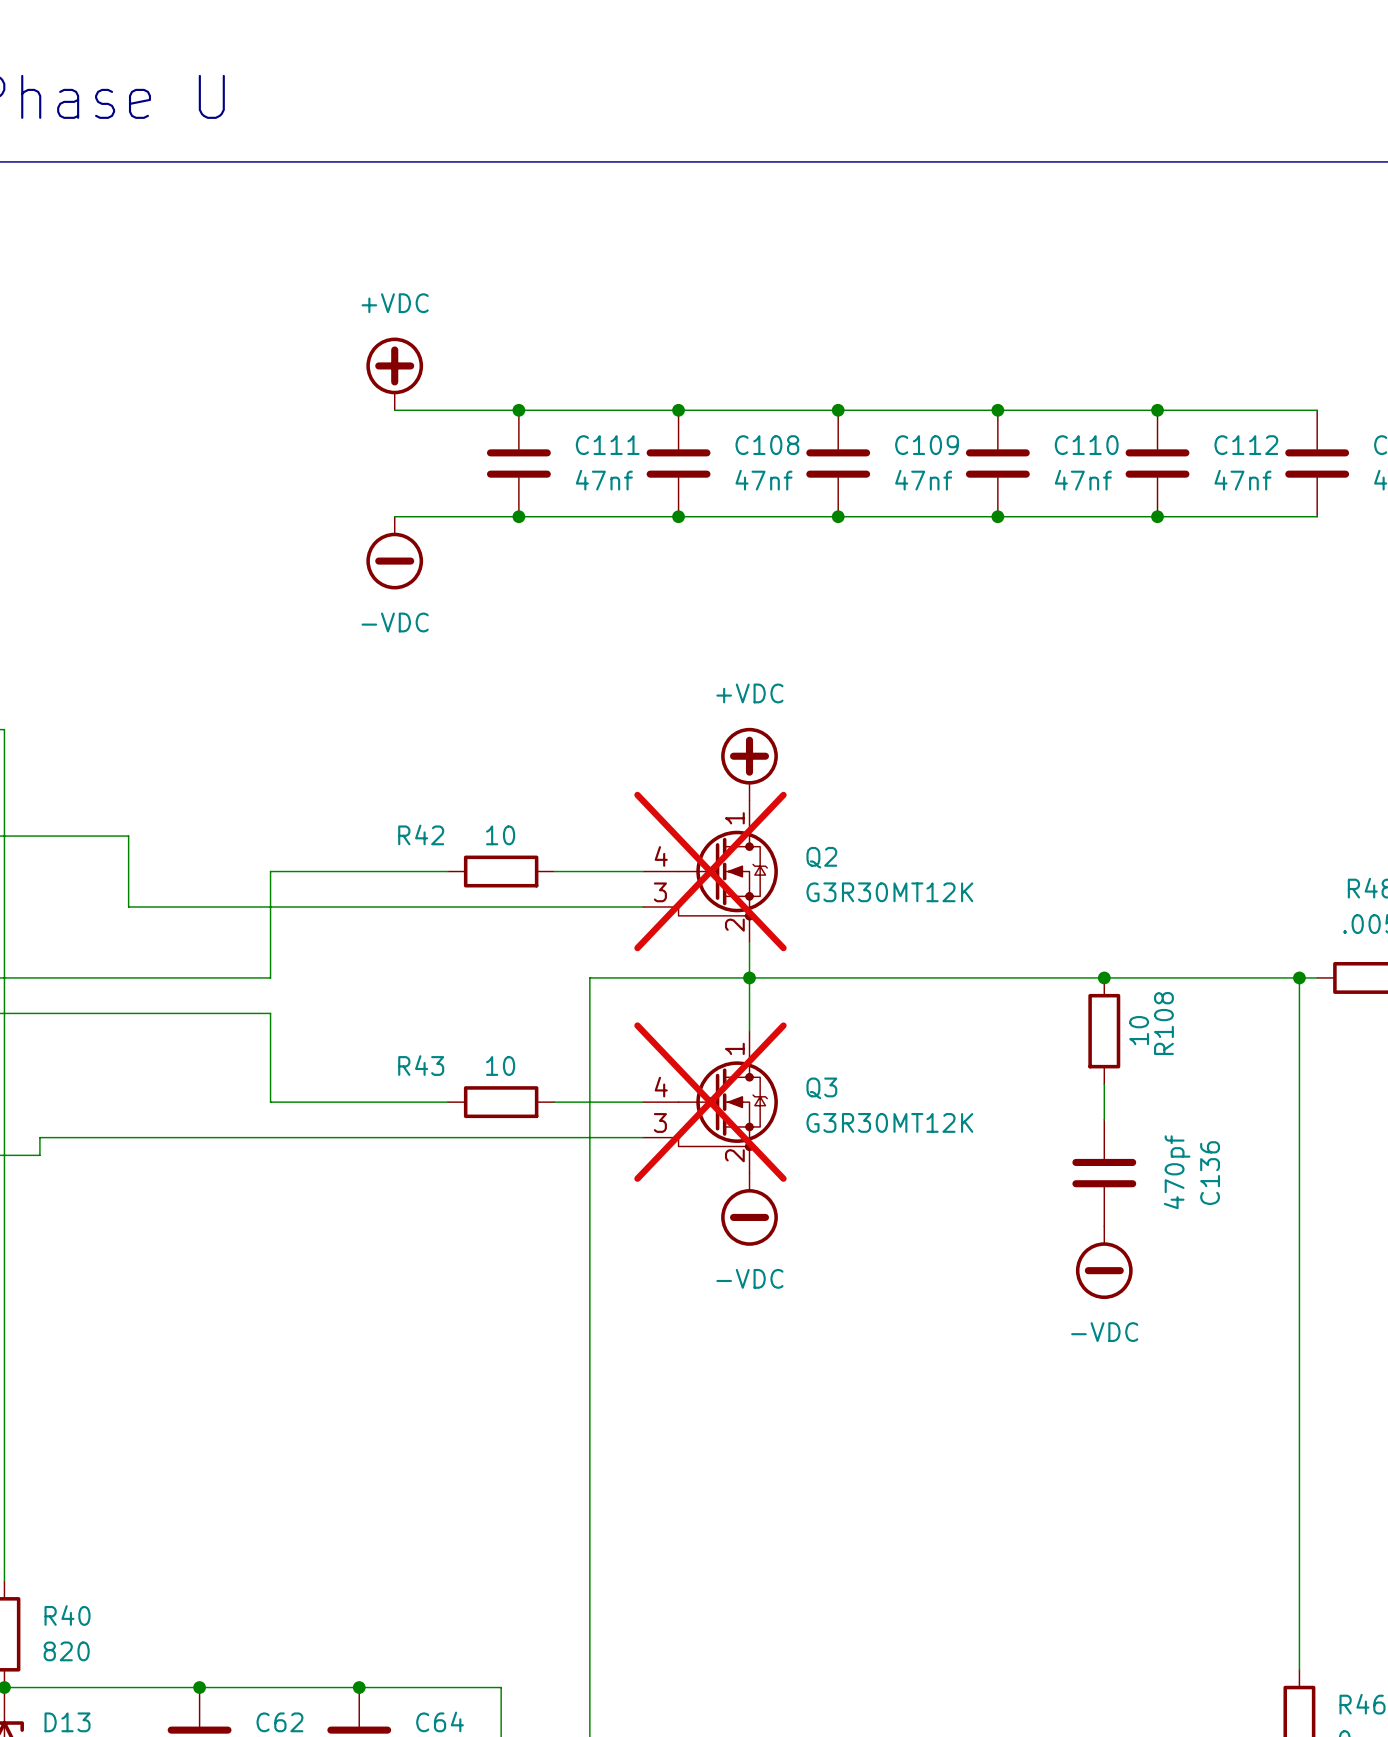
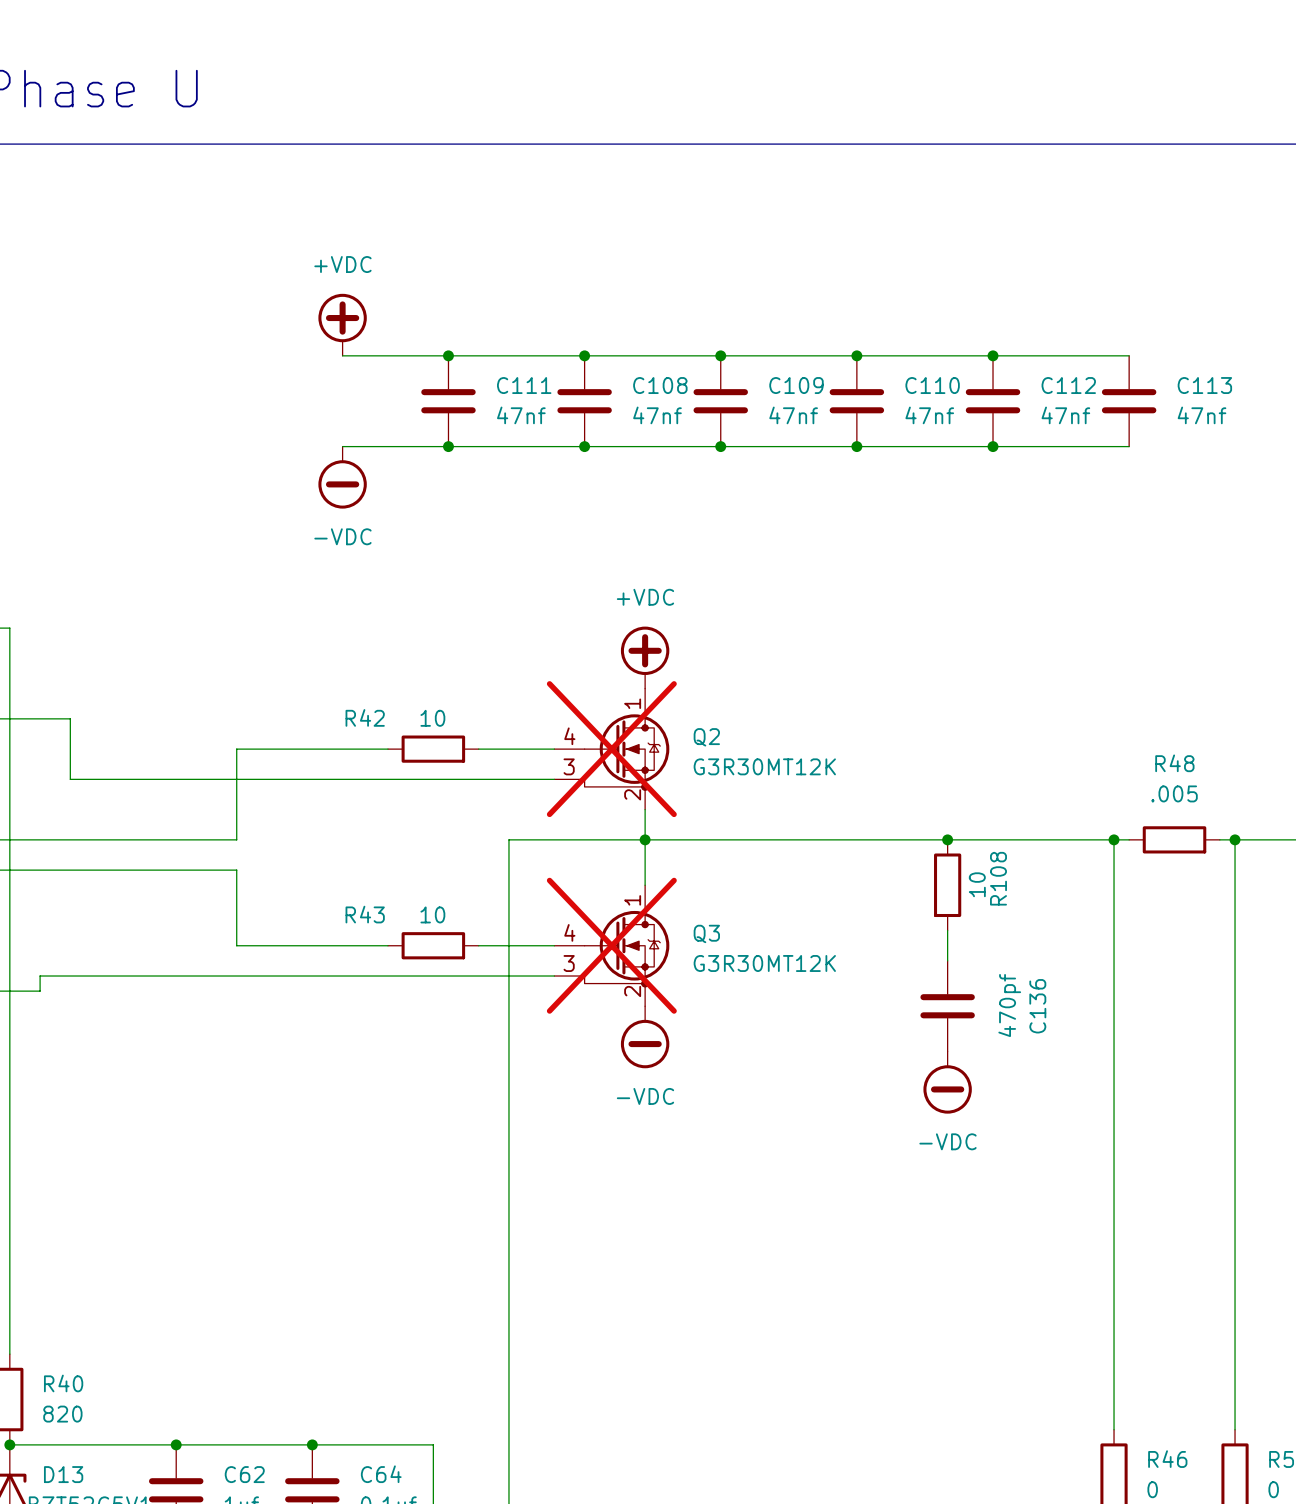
wire: (75, 836) (128, 836) (128, 907) -> (70, 718) (70, 779) (115, 779)

